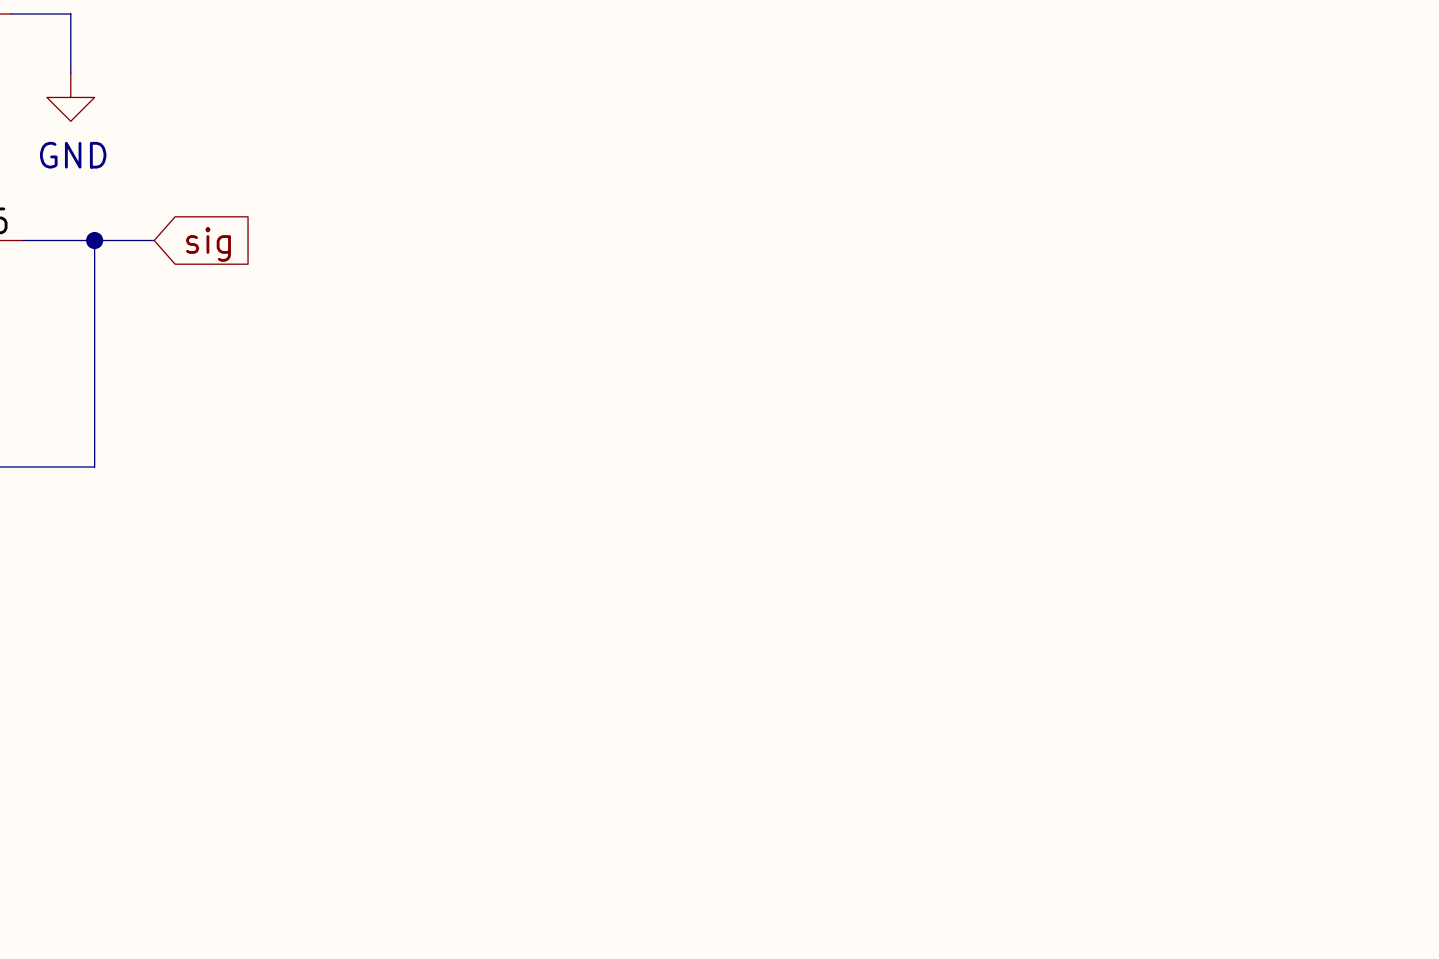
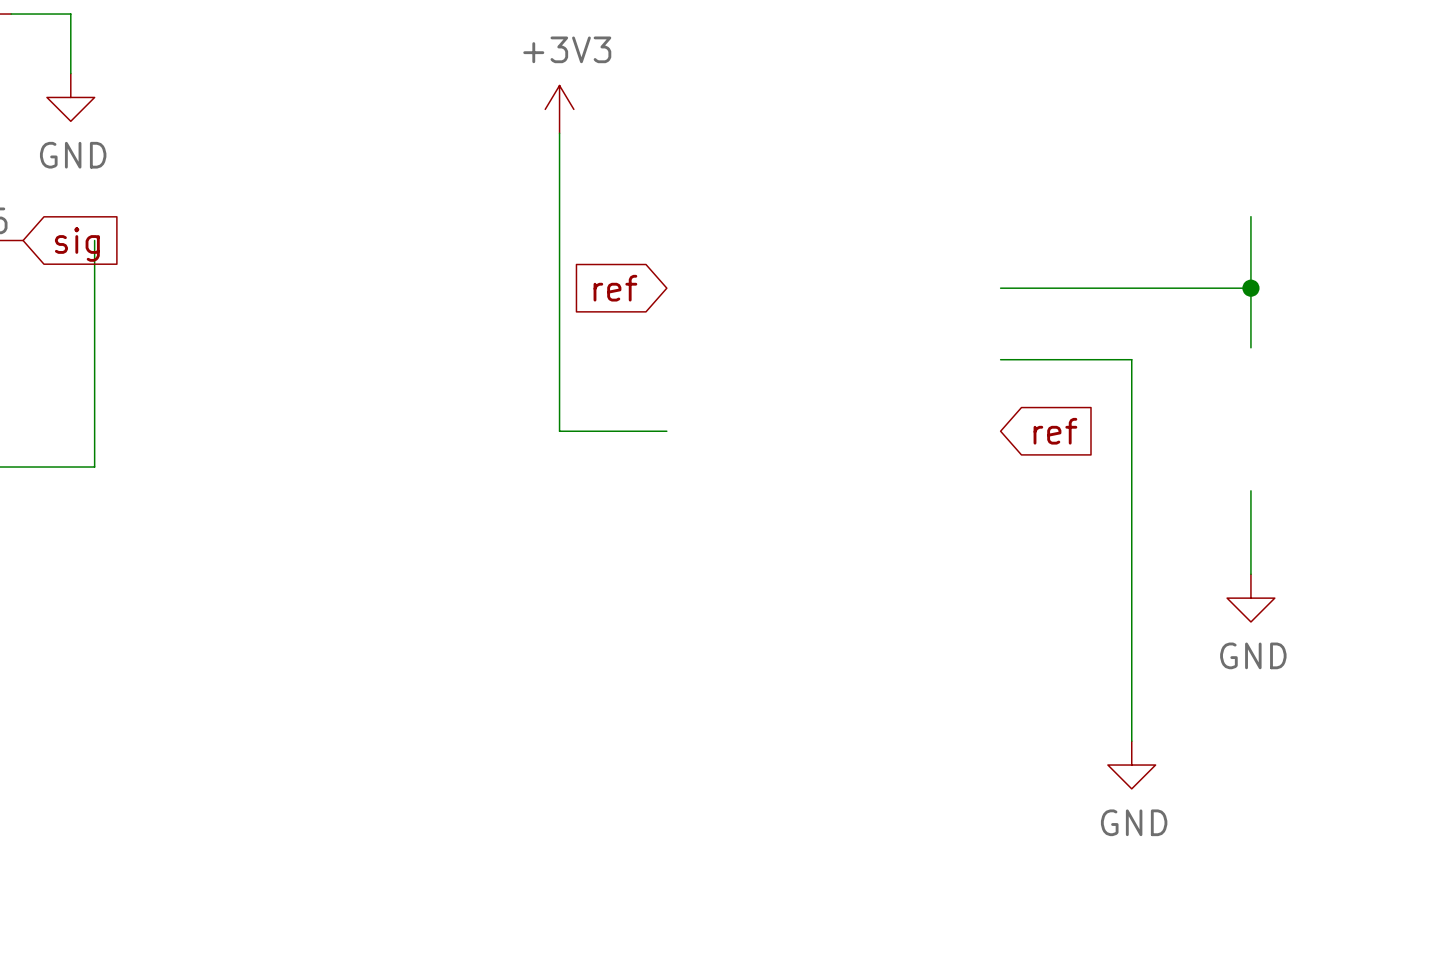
power symbol: none -> +3V3 (559, 109)
wire: none -> (559, 133) (559, 431) (666, 431)
wire: none -> (1250, 216) (1250, 347)
wire: (23, 240) (154, 240) -> none
junction: (94, 240) -> none
global label position: sig (208, 244) -> sig (77, 244)
global label: none -> ref (615, 288)
wire: none -> (1000, 288) (1250, 288)
junction: none -> (1250, 288)
wire: none -> (1000, 359) (1131, 359) (1131, 741)
global label: none -> ref (1055, 431)
wire: none -> (1250, 490) (1250, 574)
power symbol: none -> GND (1250, 598)
power symbol: none -> GND (1131, 765)

